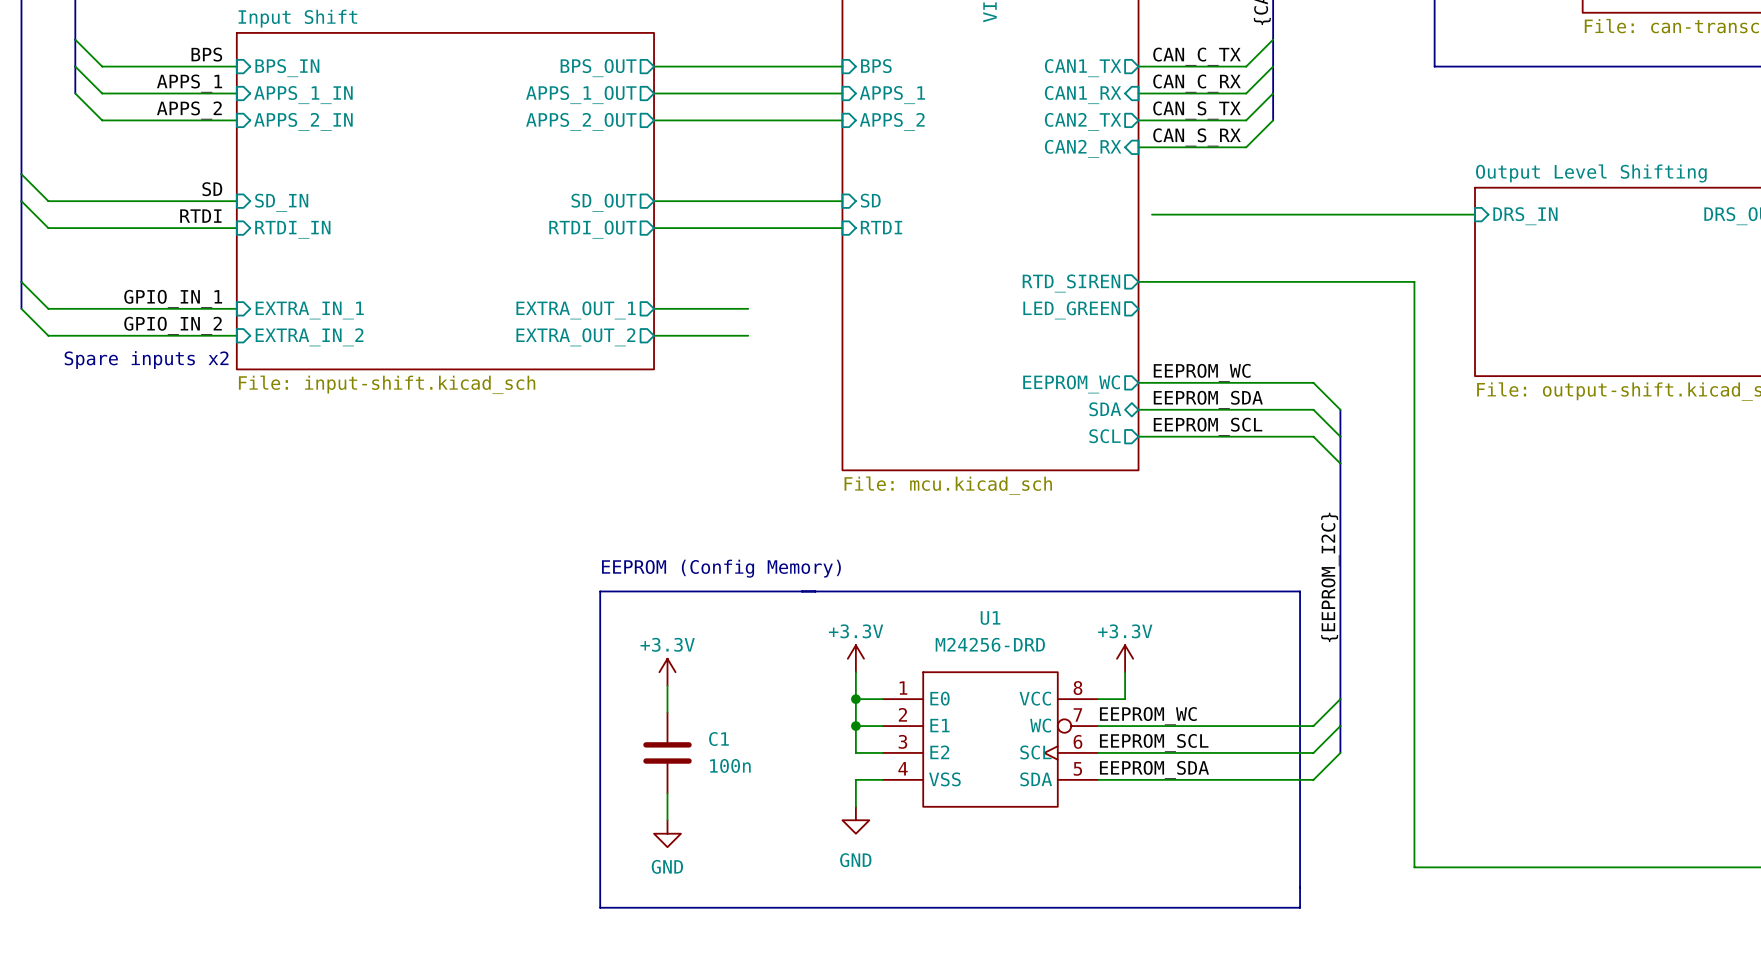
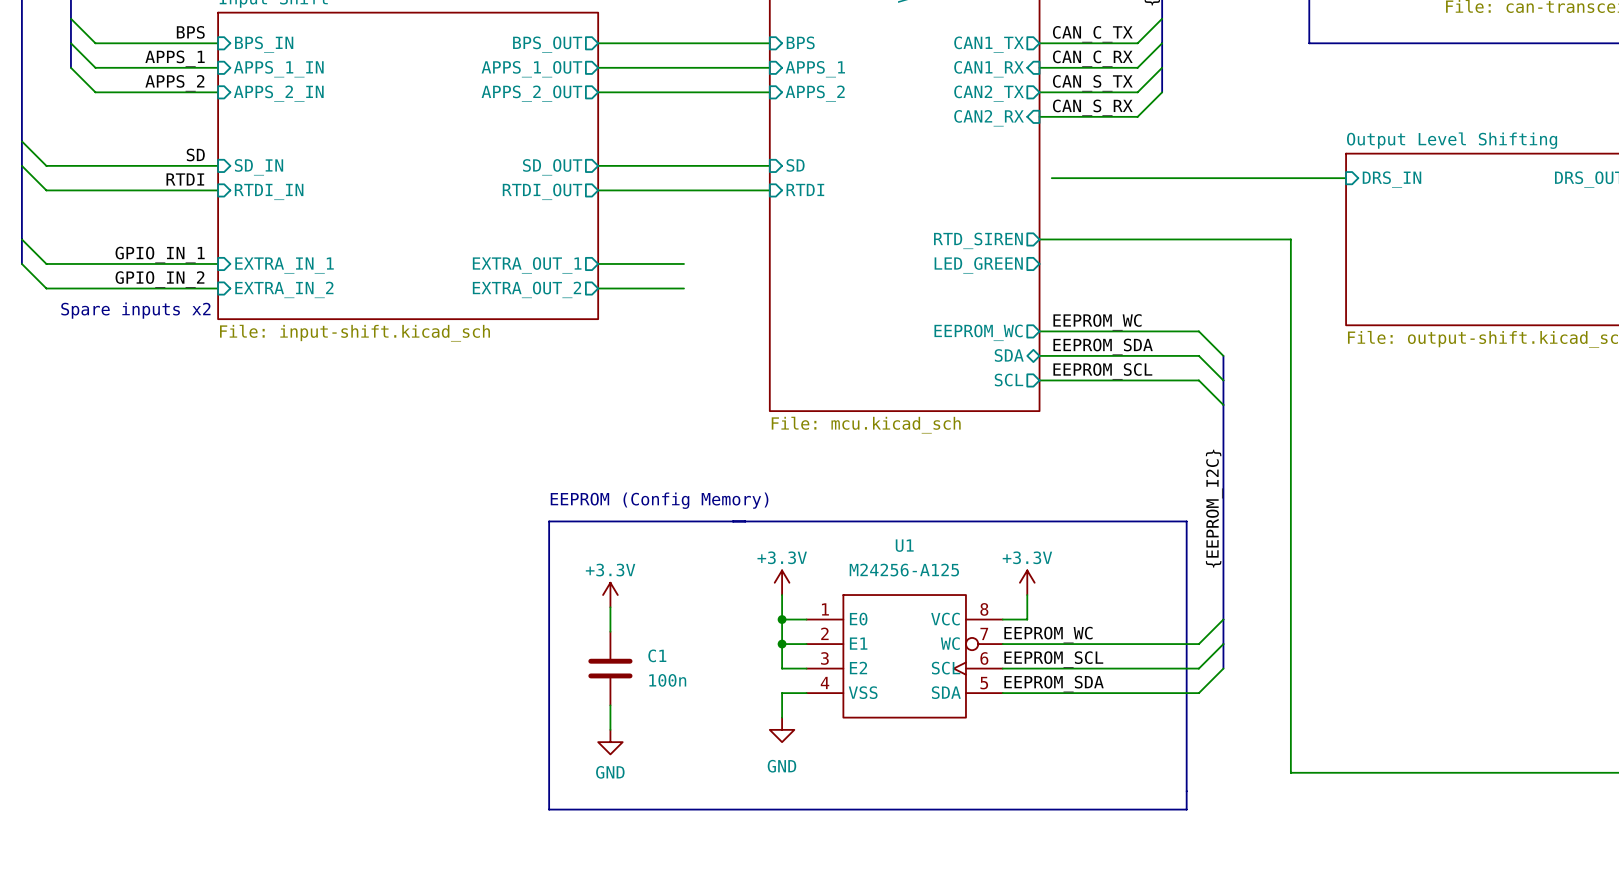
U1 value: M24256-DRD (990, 644) -> M24256-A125 (904, 570)

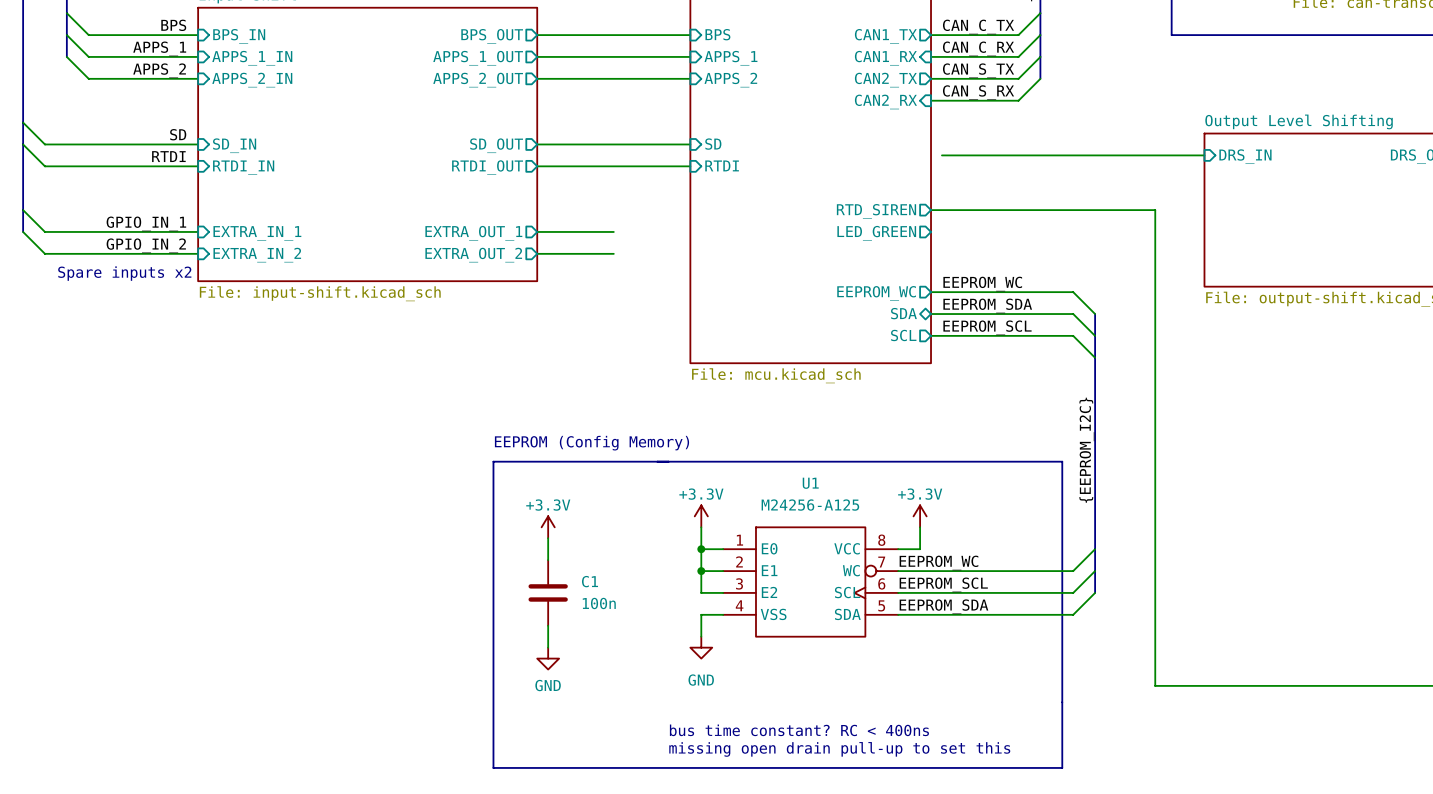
line: (549, 809) (1186, 809) -> (493, 718) (493, 767) (1062, 767) (1062, 718)
text: none -> bus time constant? RC < 400ns (799, 730)
text: none -> missing open drain pull-up to set this (839, 749)

